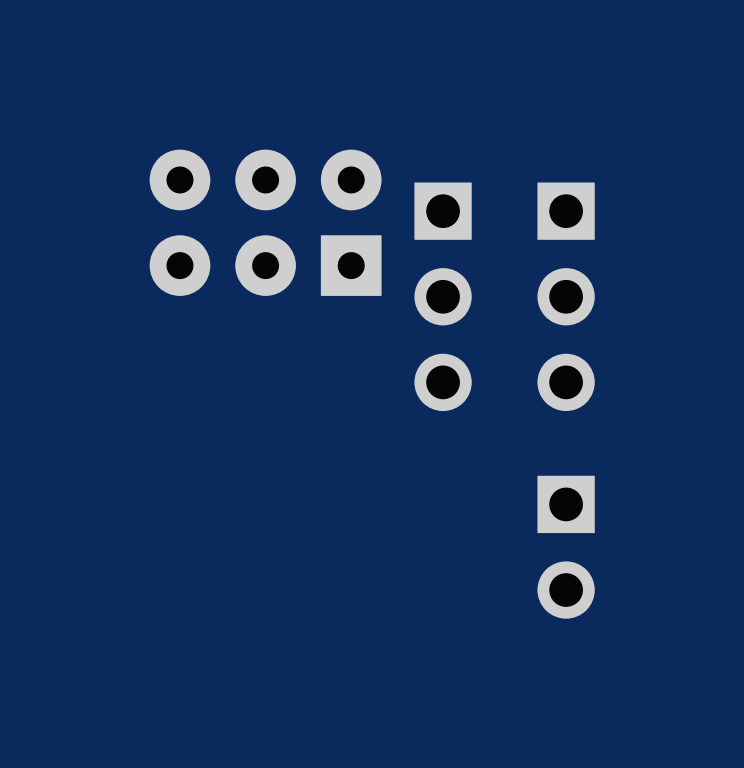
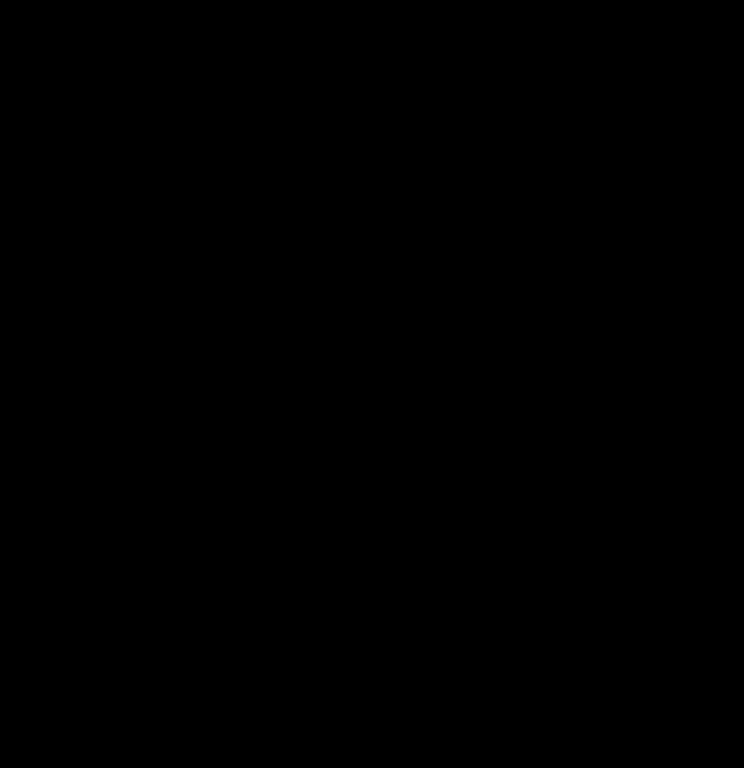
part: (265, 222) -> none
part: (443, 296) -> none
part: (566, 296) -> none
part: (566, 547) -> none

